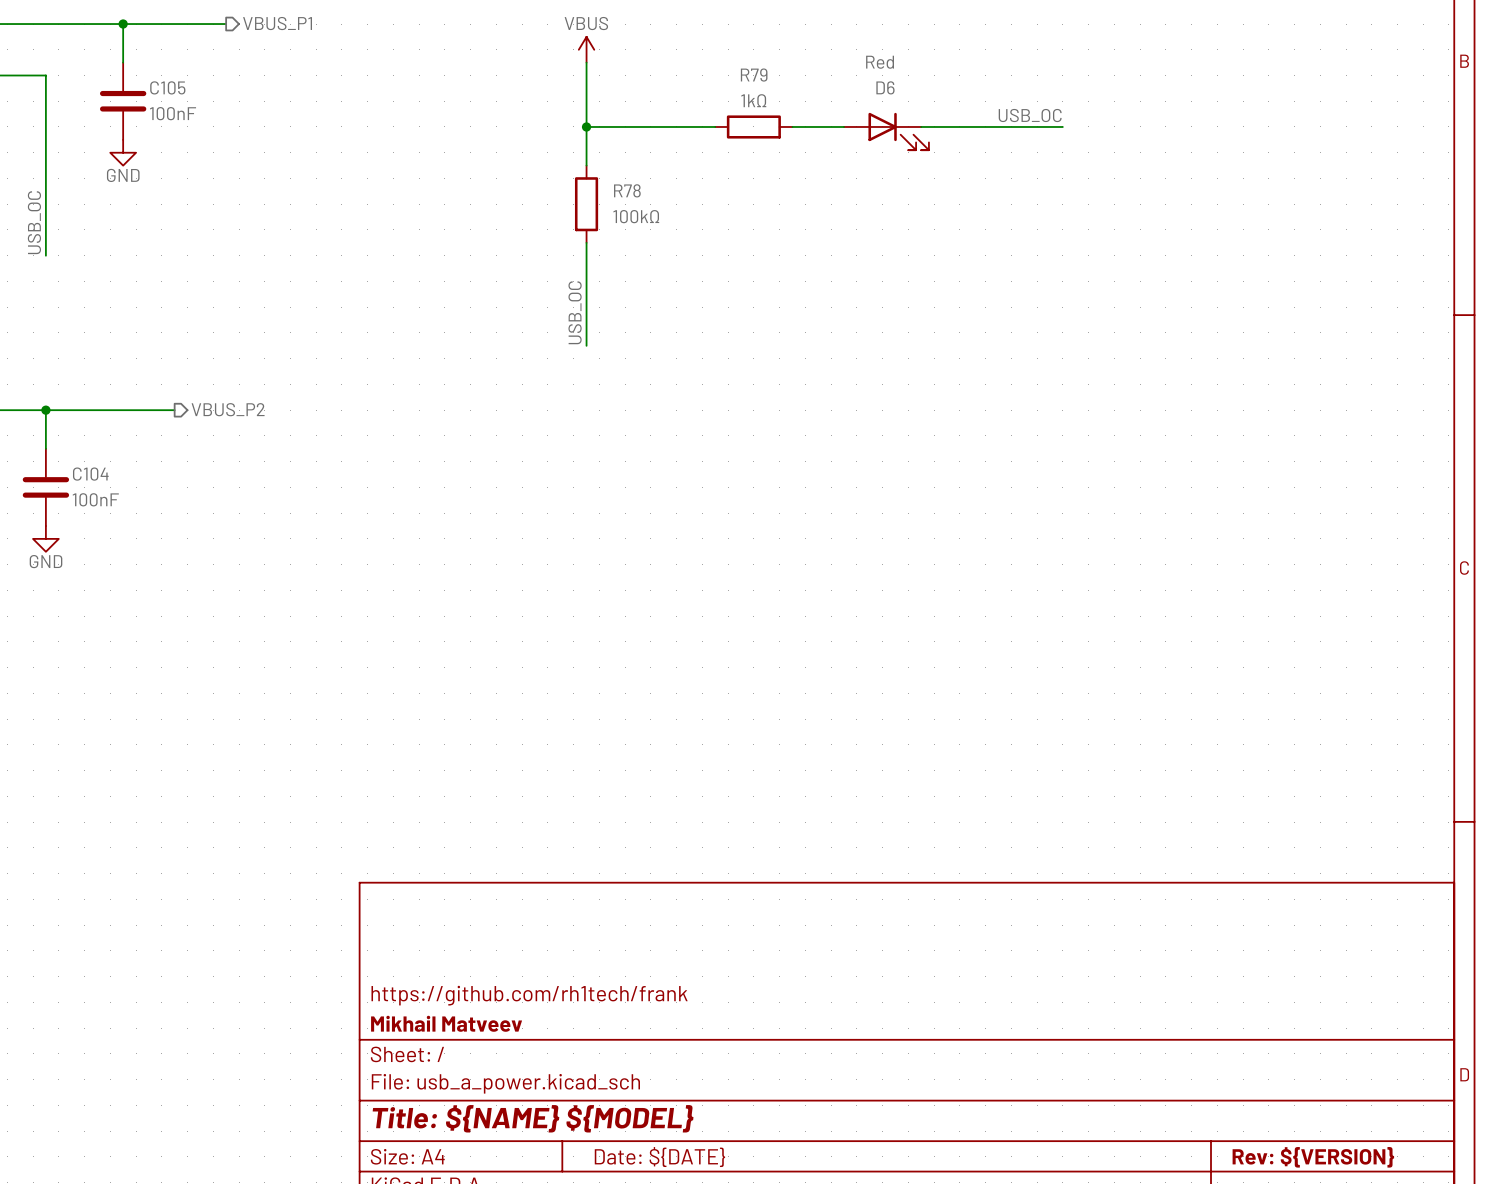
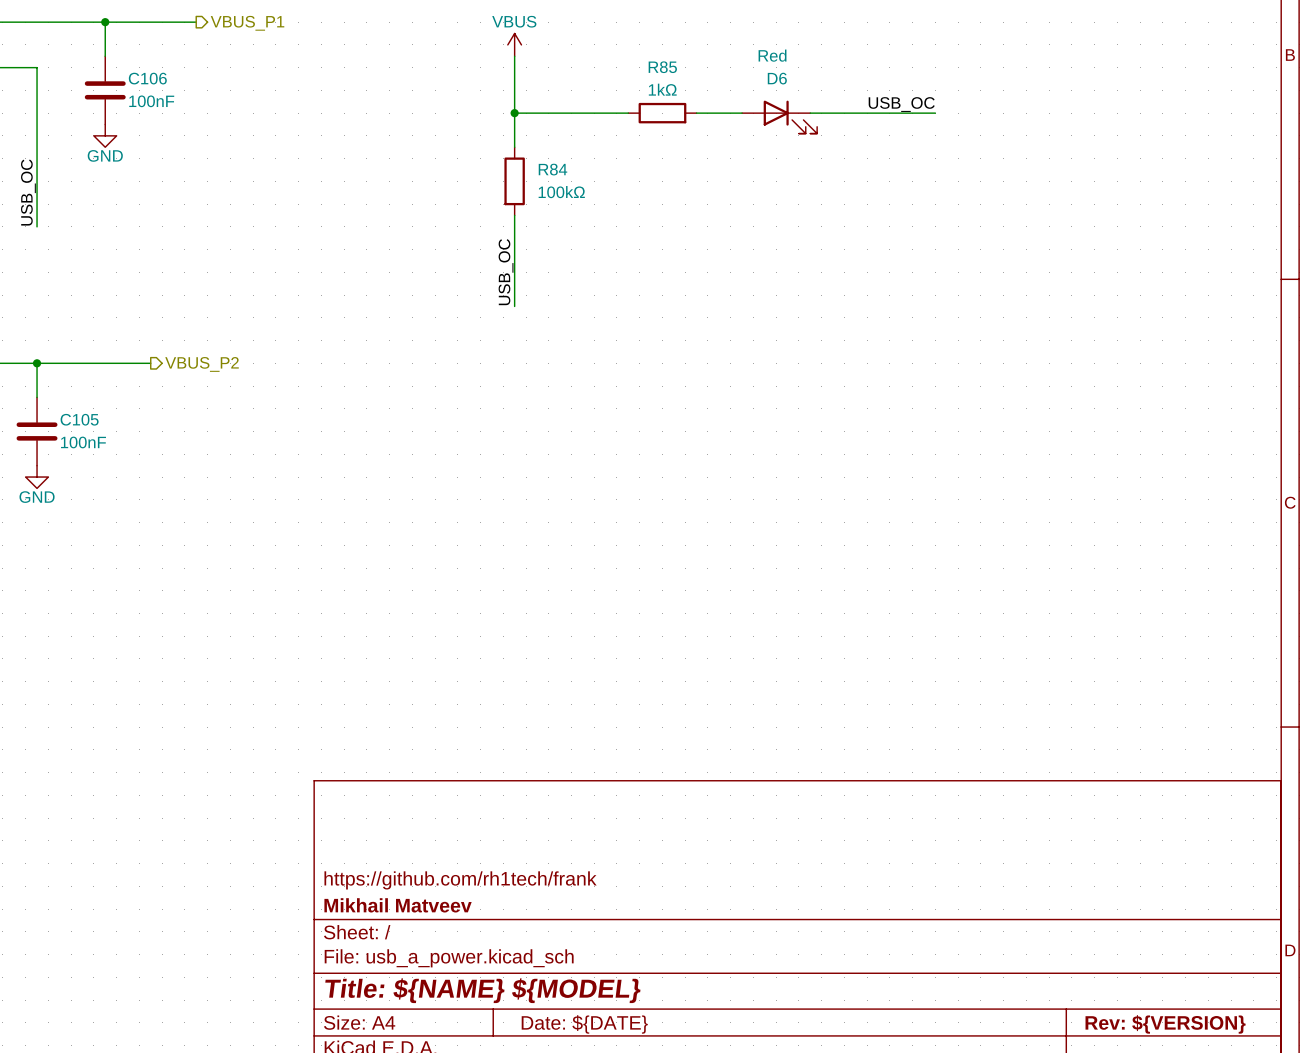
R79 name: R79 (754, 75) -> R85 (662, 67)
C105 name: C105 (167, 87) -> C106 (147, 78)
R78 name: R78 (627, 190) -> R84 (552, 169)
C104 name: C104 (90, 474) -> C105 (79, 419)

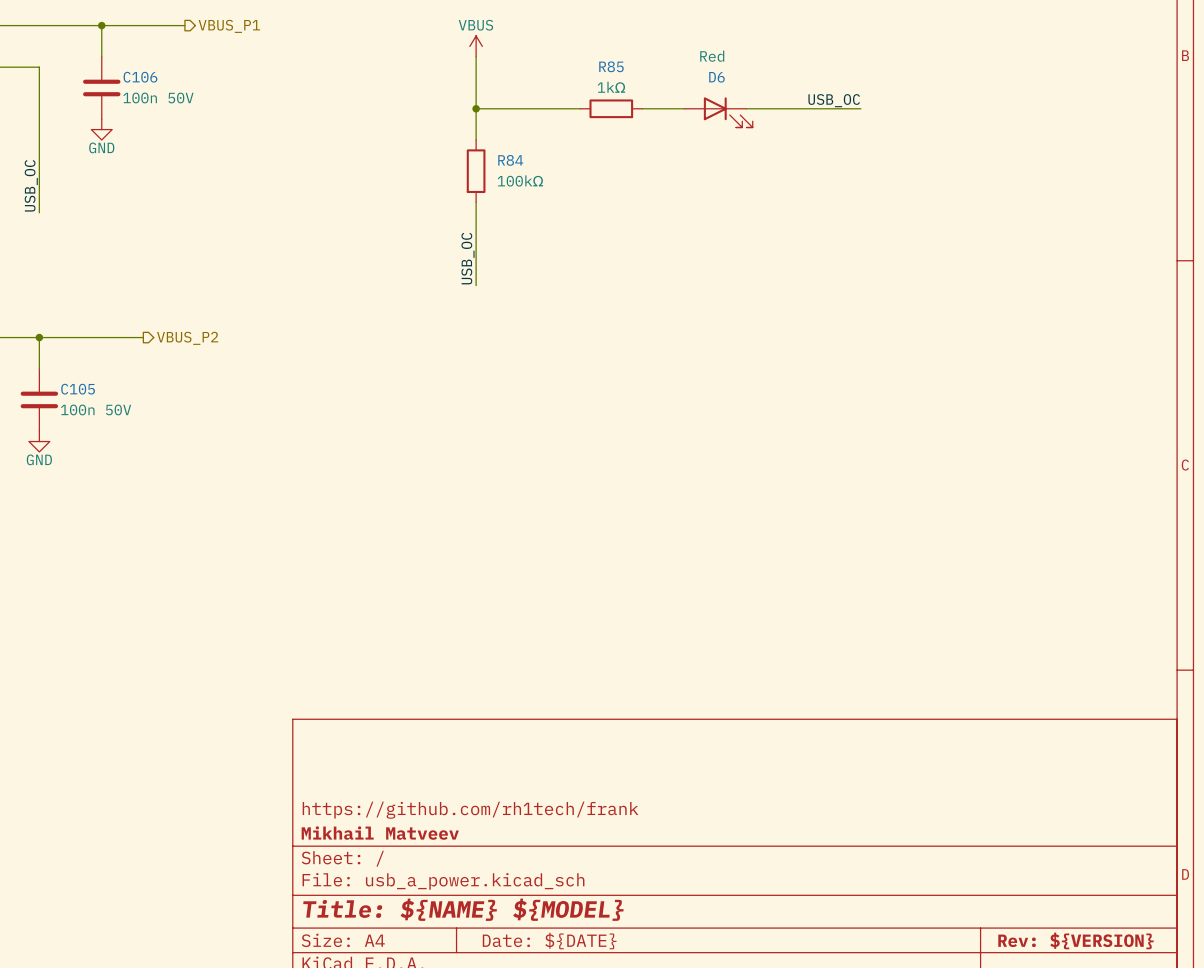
C106 value: 100nF (151, 101) -> 100n 50V (158, 98)
C105 value: 100nF (83, 442) -> 100n 50V (96, 409)

